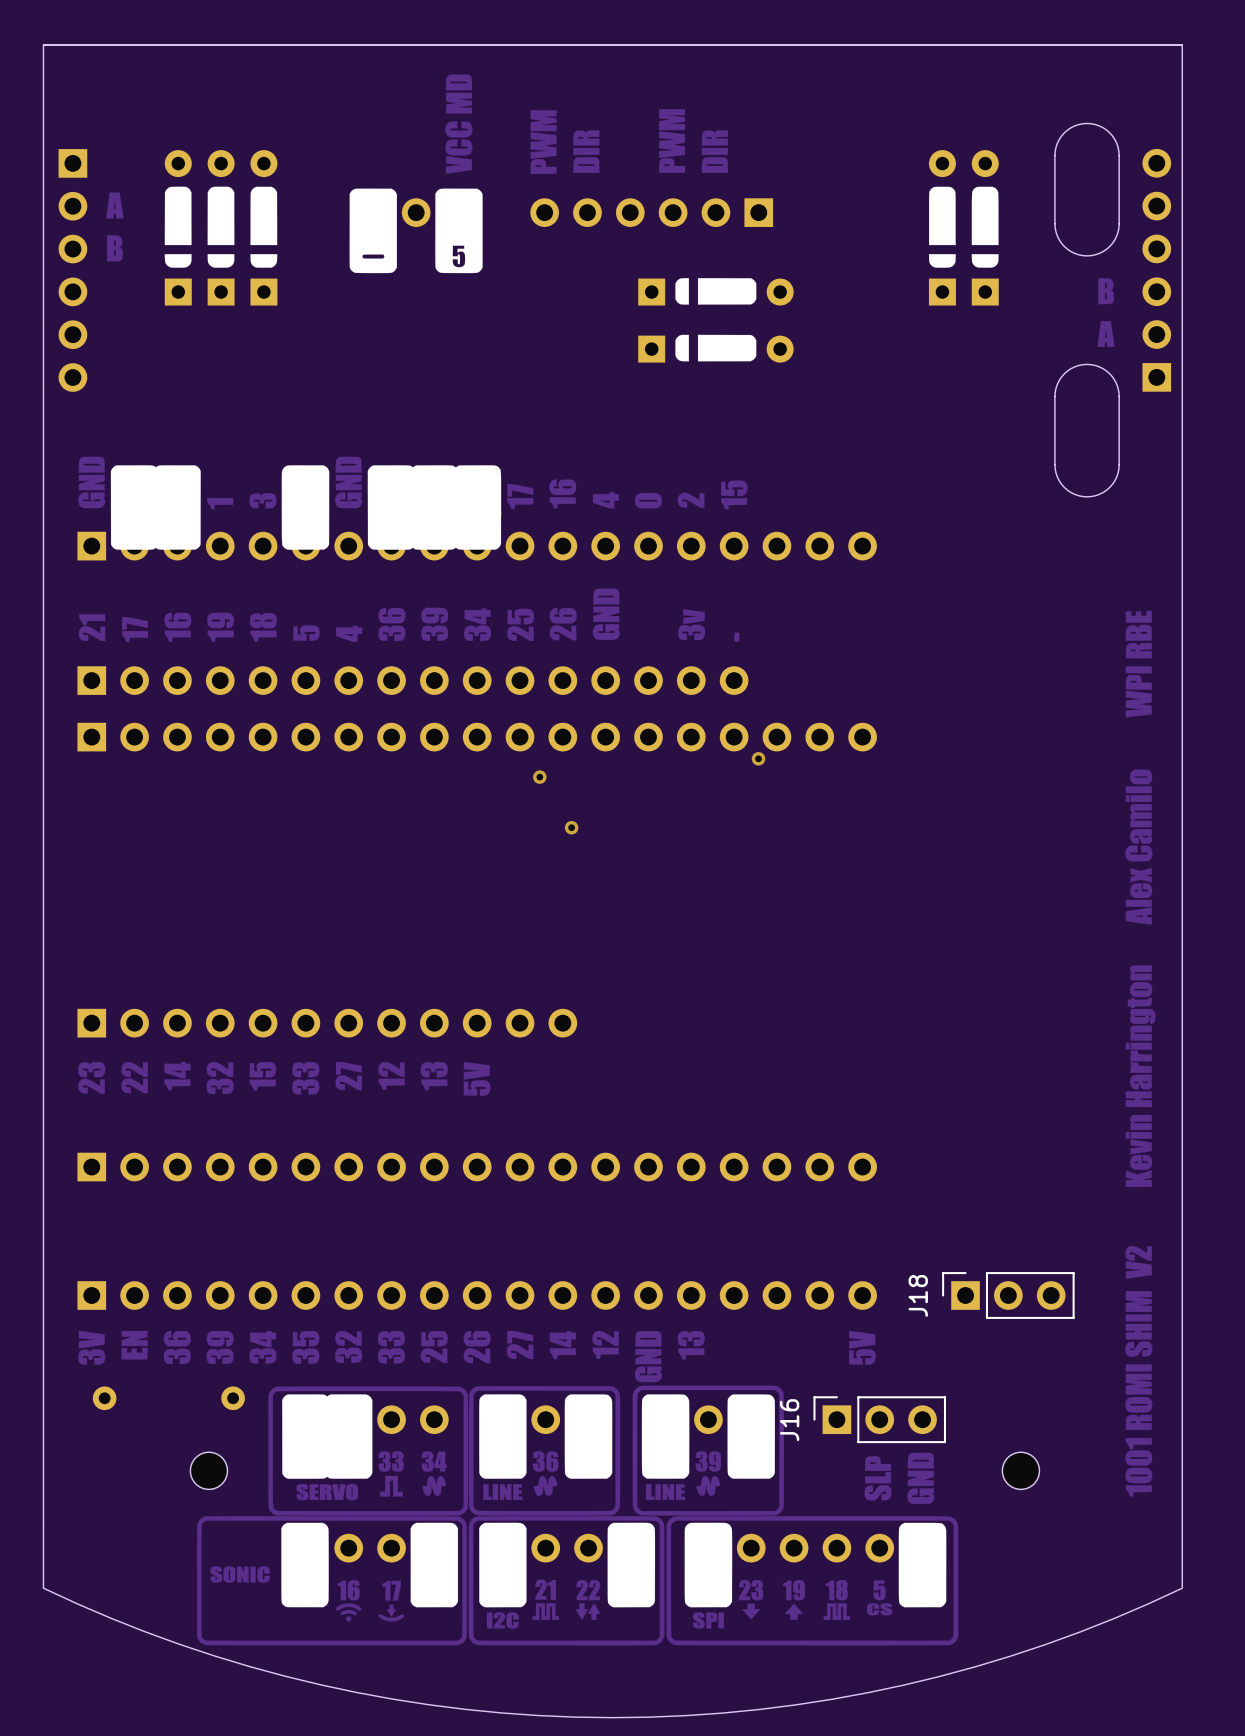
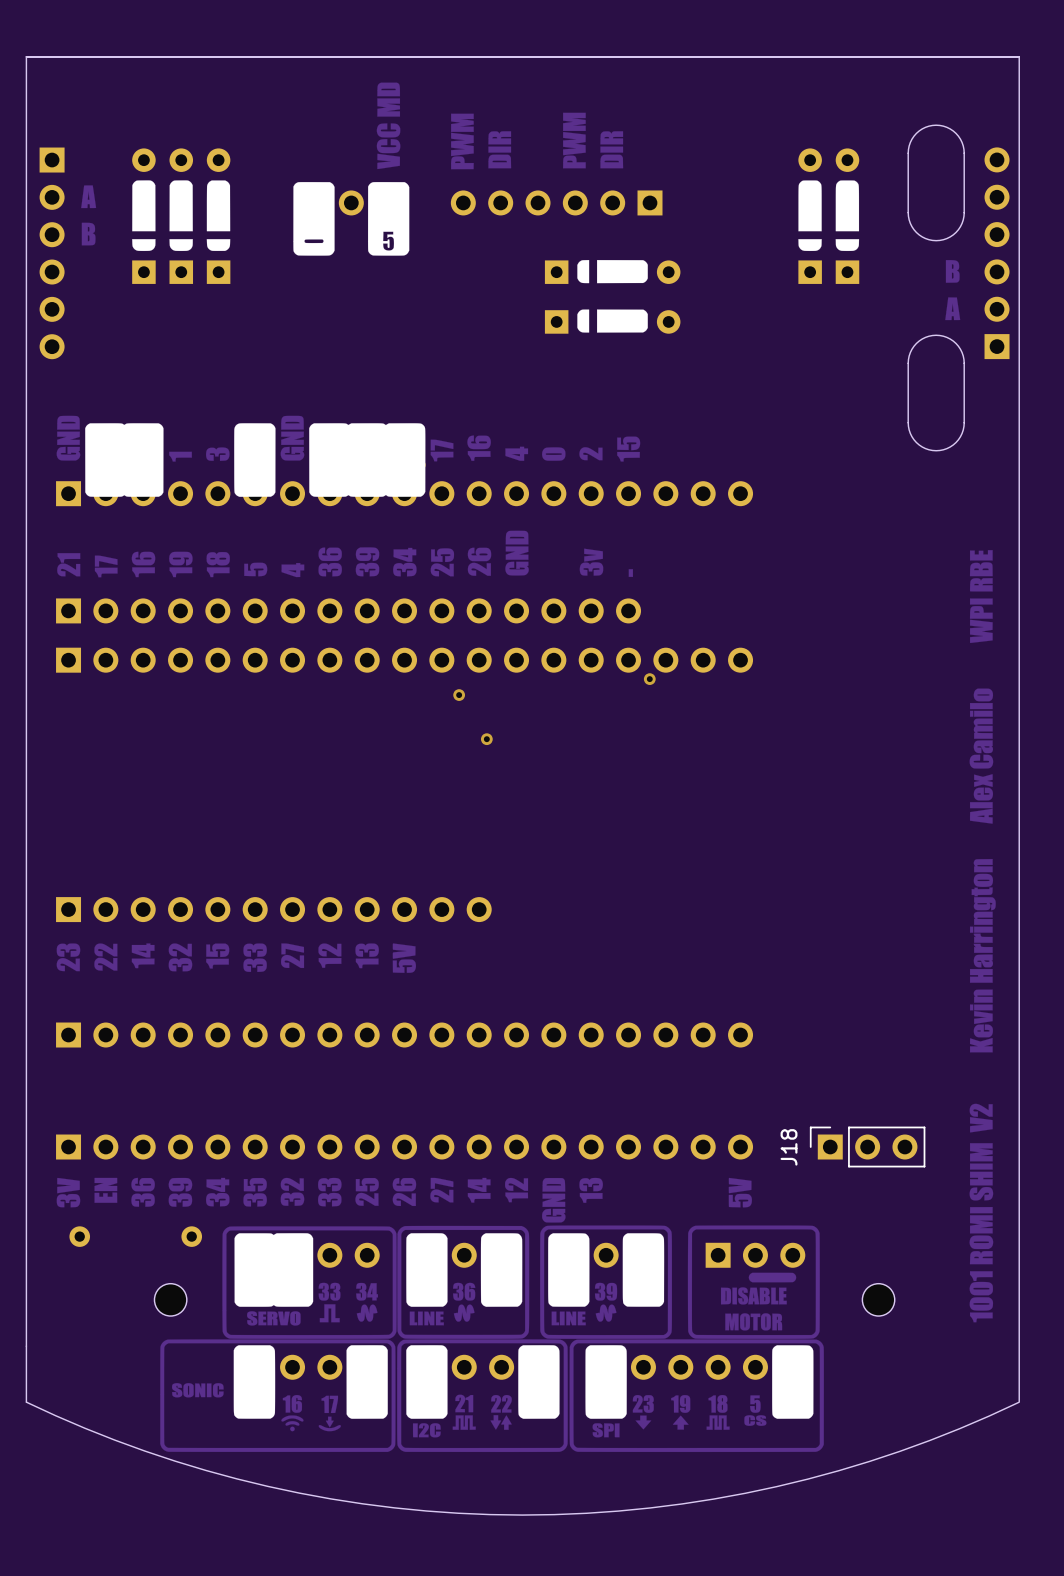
drawing shape: [78, 74, 1156, 1646] -> [56, 82, 996, 1453]
J16: (879, 1419) -> none

